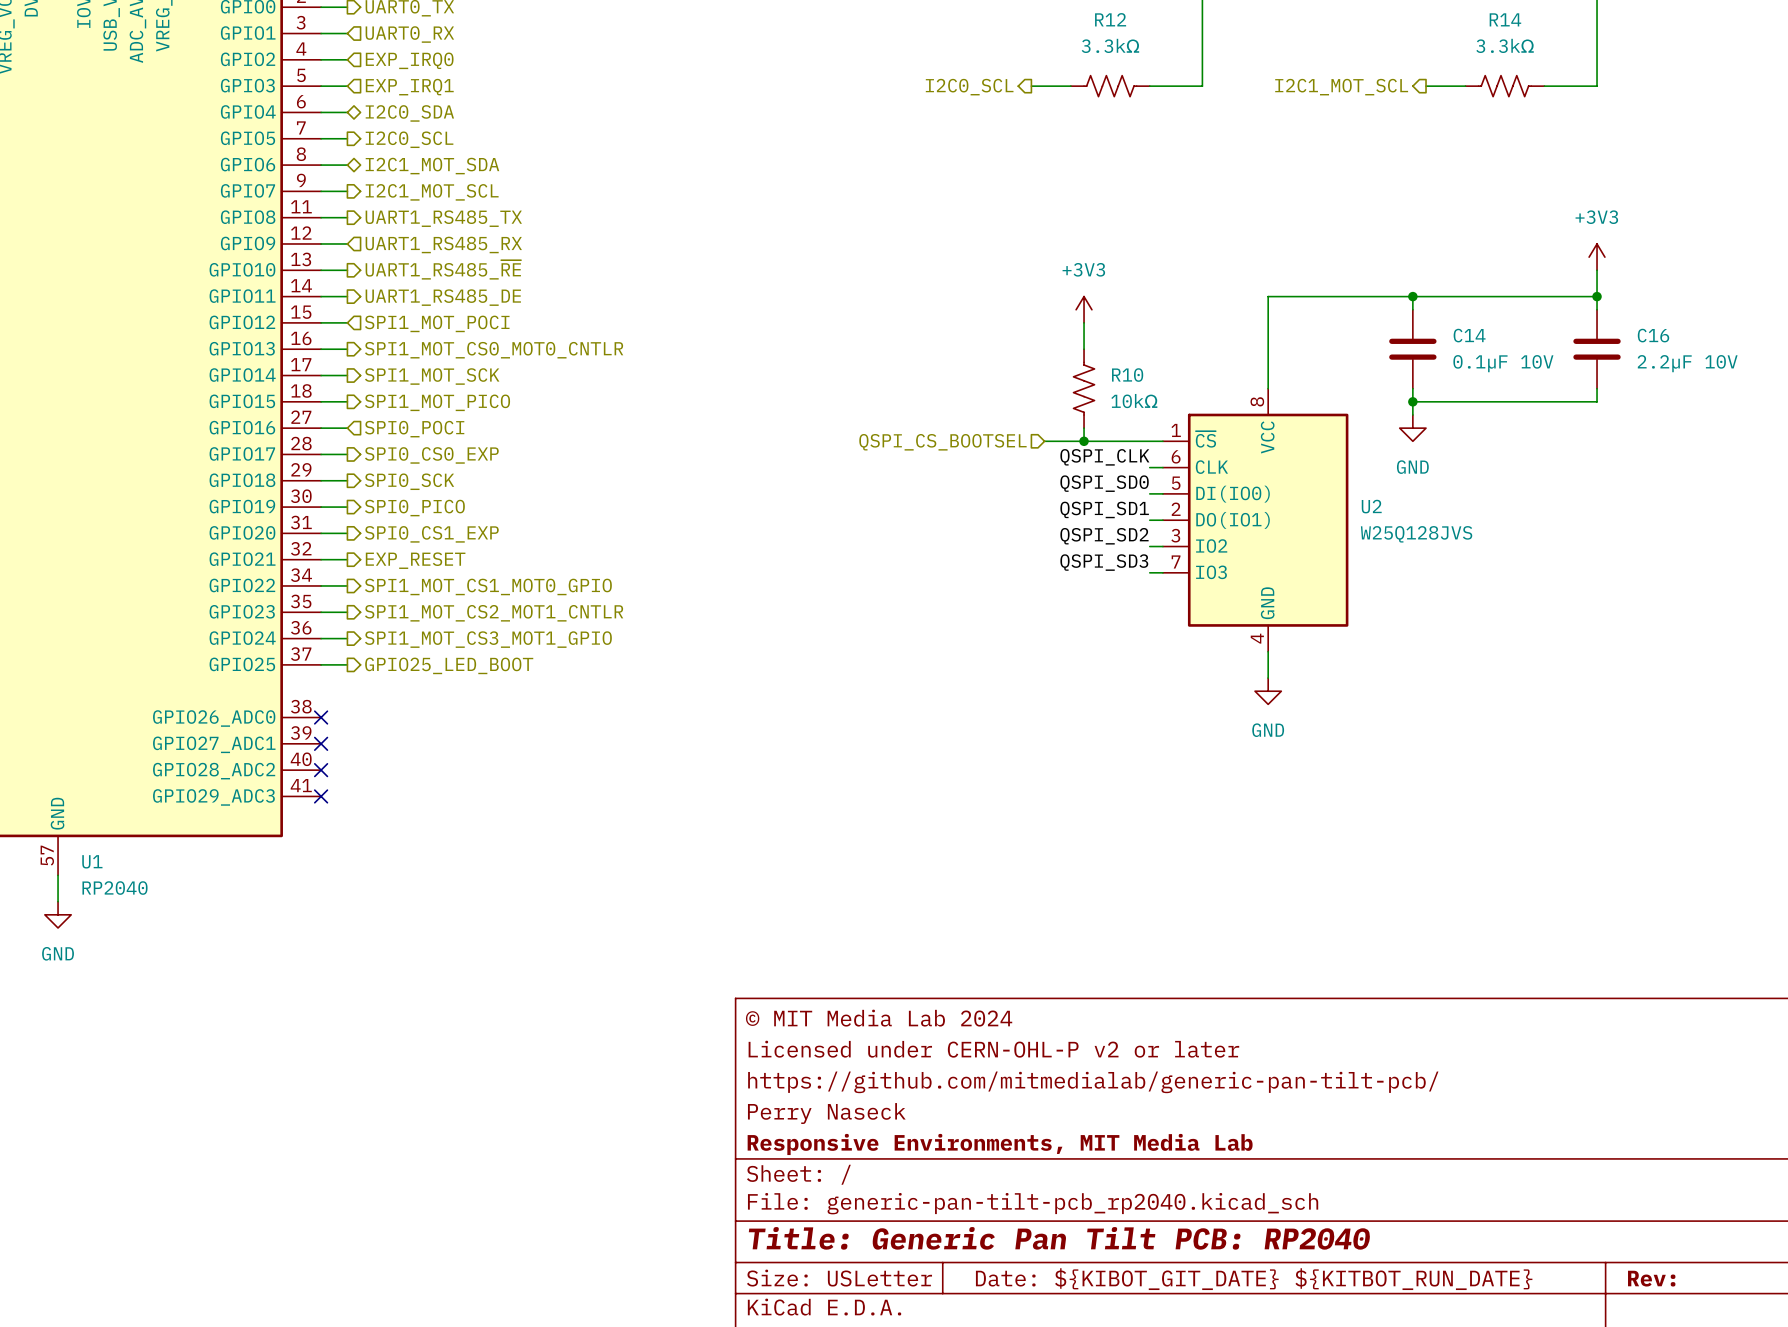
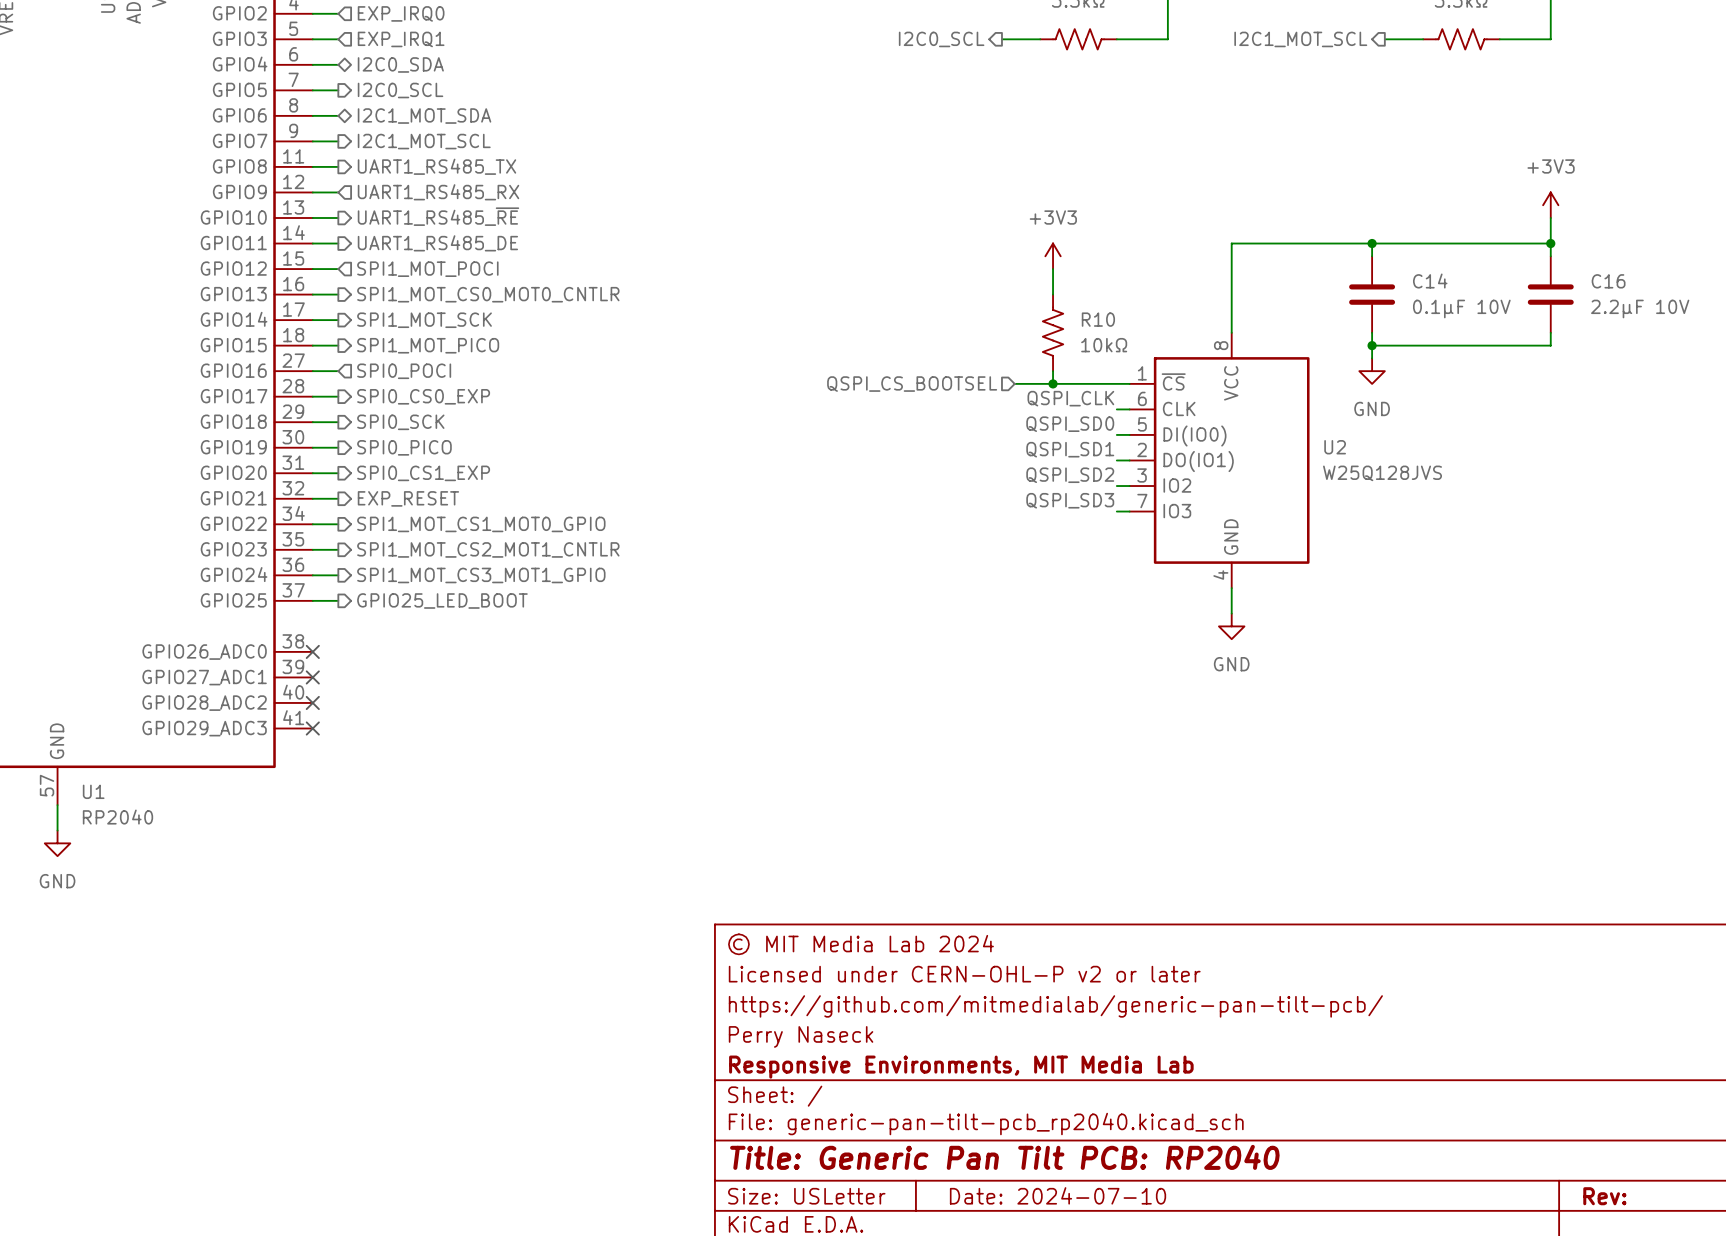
title block: Date: ${KIBOT_GIT_DATE} ${KITBOT_RUN_DATE} (1254, 1279) -> Date: 2024-07-10 (1058, 1195)

